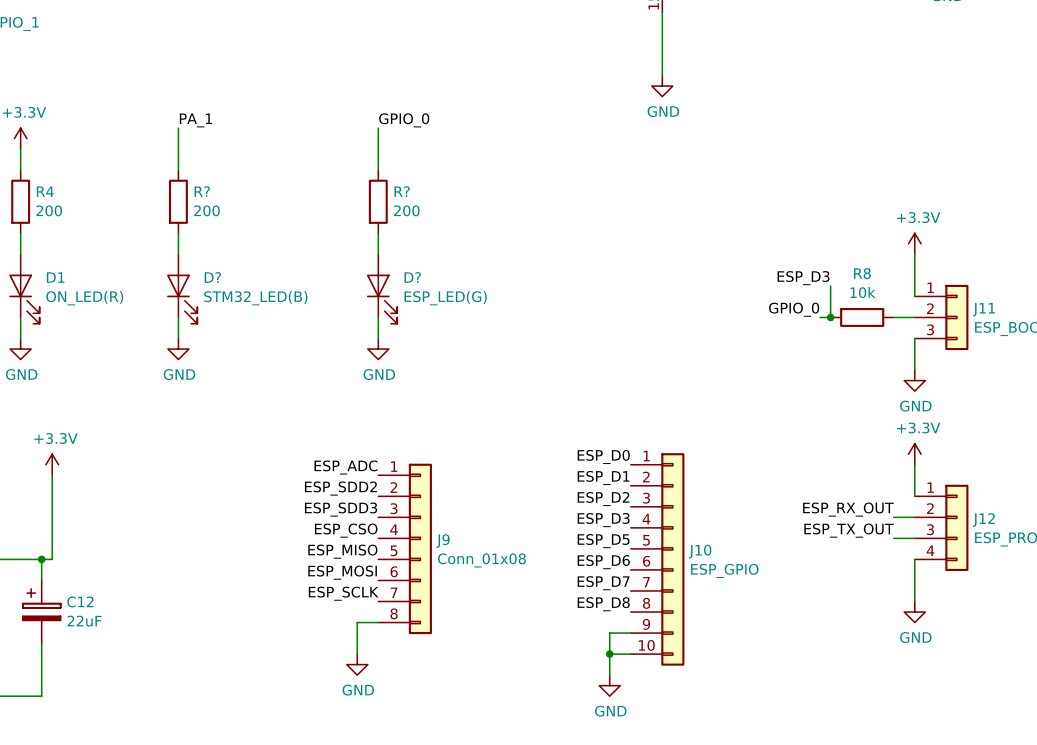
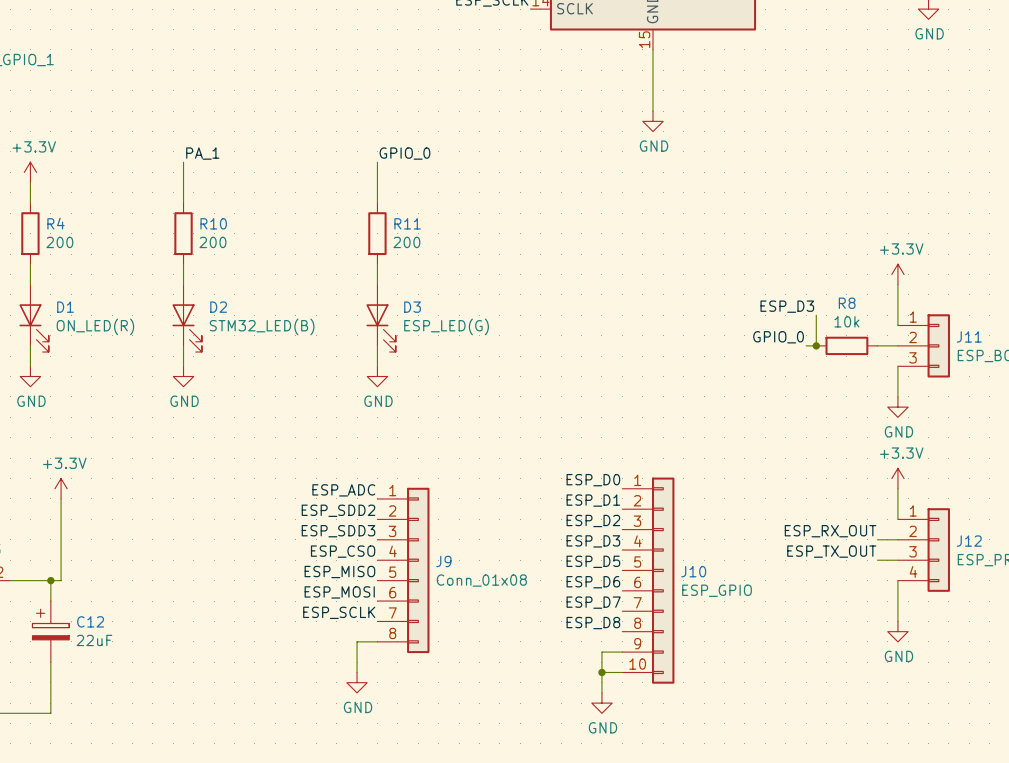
R? name: R? (202, 191) -> R10 (213, 223)
R? name: R? (402, 191) -> R11 (407, 223)
D? name: D? (212, 277) -> D2 (218, 307)
D? name: D? (412, 277) -> D3 (412, 307)

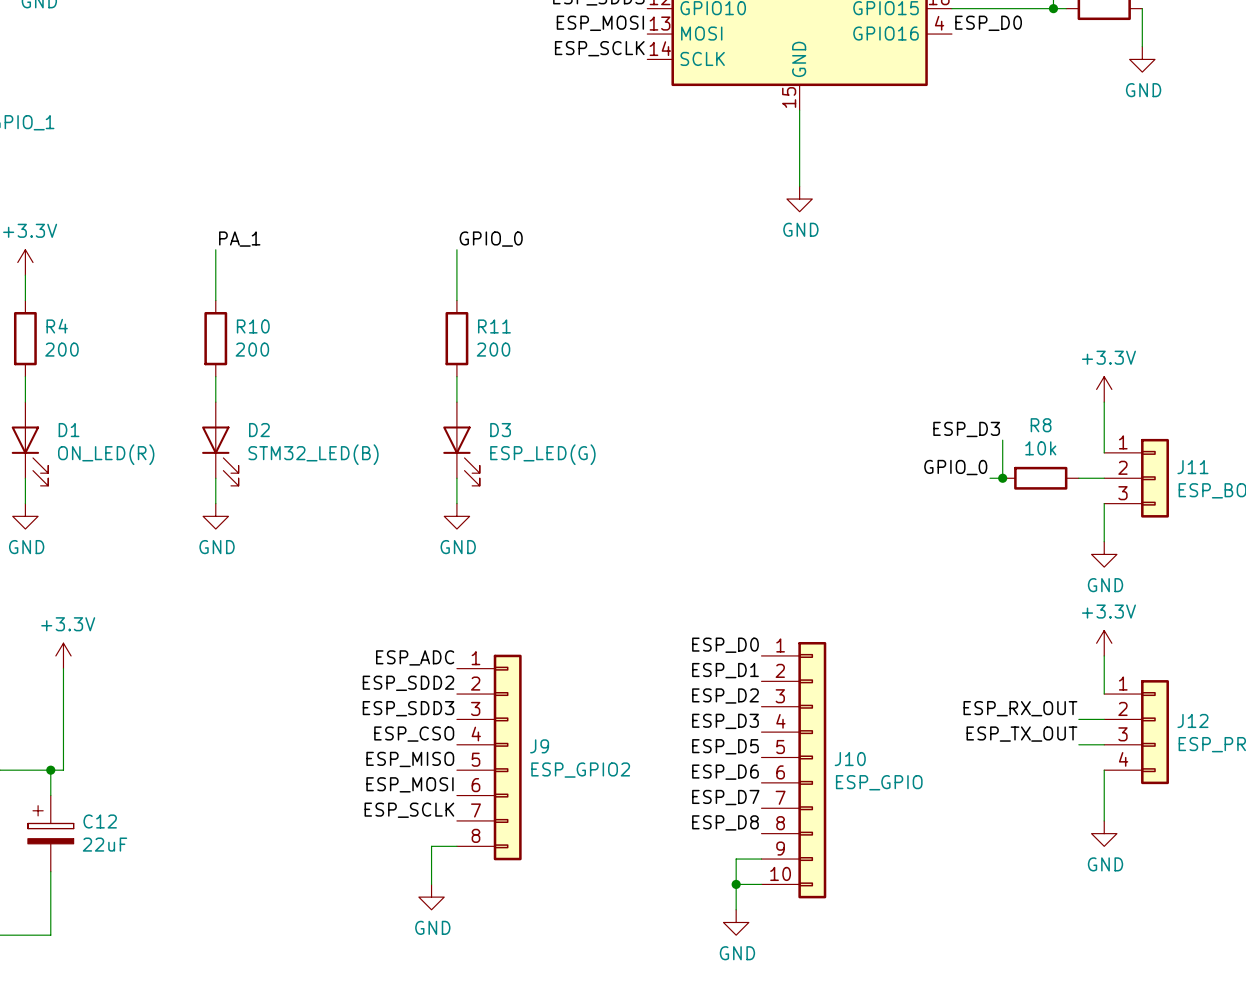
J9 value: Conn_01x08 (481, 580) -> ESP_GPIO2 (580, 770)

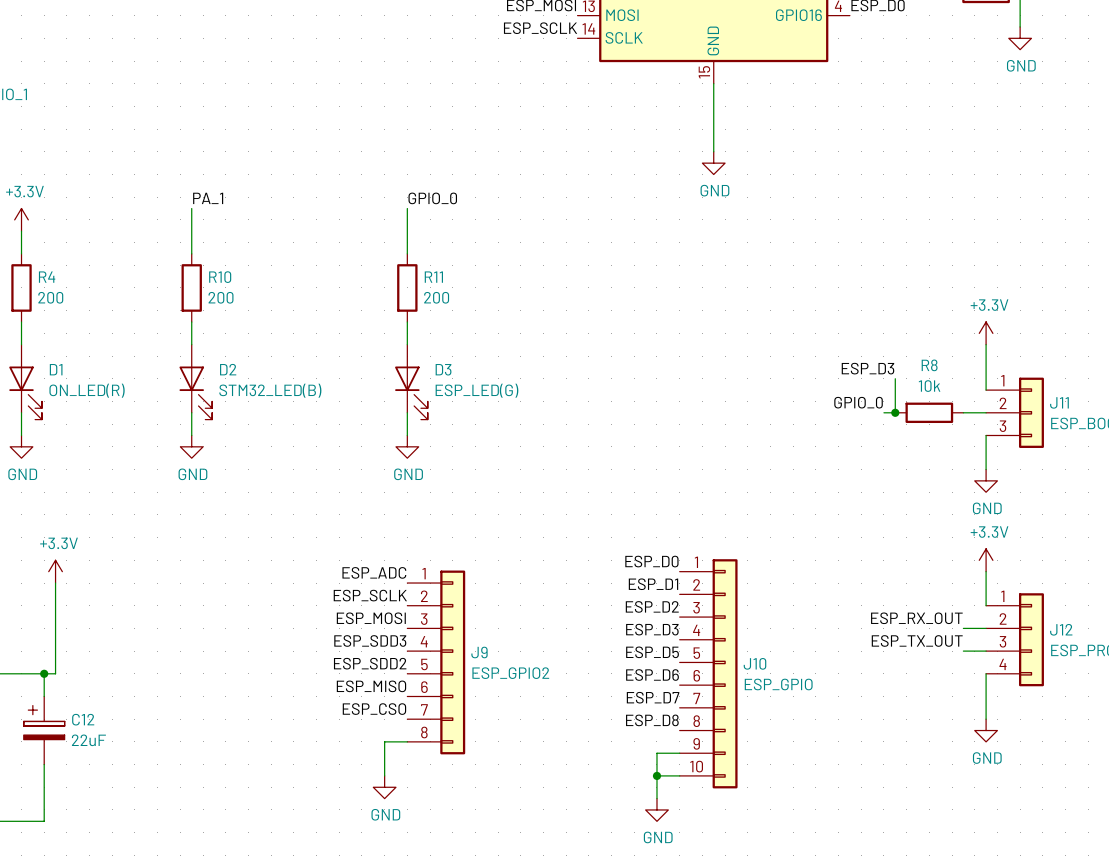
label: ESP_SDD2 (408, 683) -> ESP_SCLK (370, 595)
label: ESP_SDD3 (408, 708) -> ESP_MOSI (371, 618)
label: ESP_CSO (414, 734) -> ESP_SDD3 (370, 640)
label: ESP_MISO (410, 759) -> ESP_SDD2 (370, 663)
label: ESP_MOSI (409, 784) -> ESP_MISO (371, 686)
label: ESP_SCLK (409, 810) -> ESP_CSO (374, 709)

